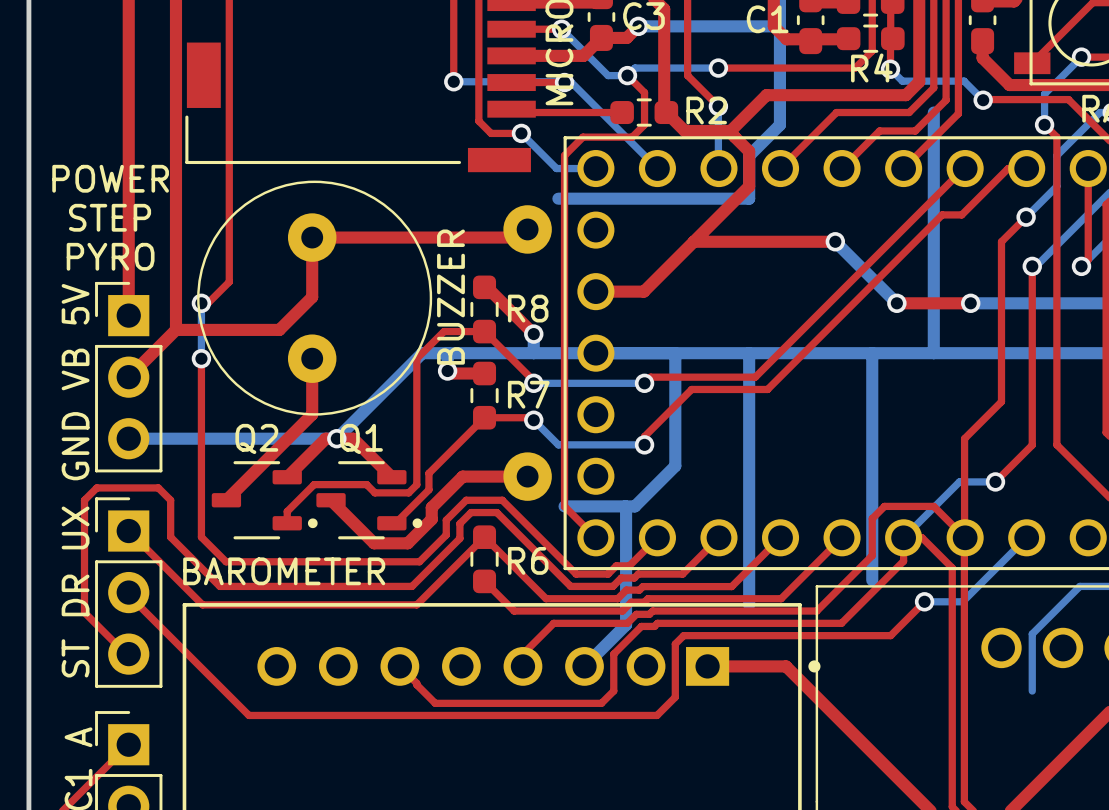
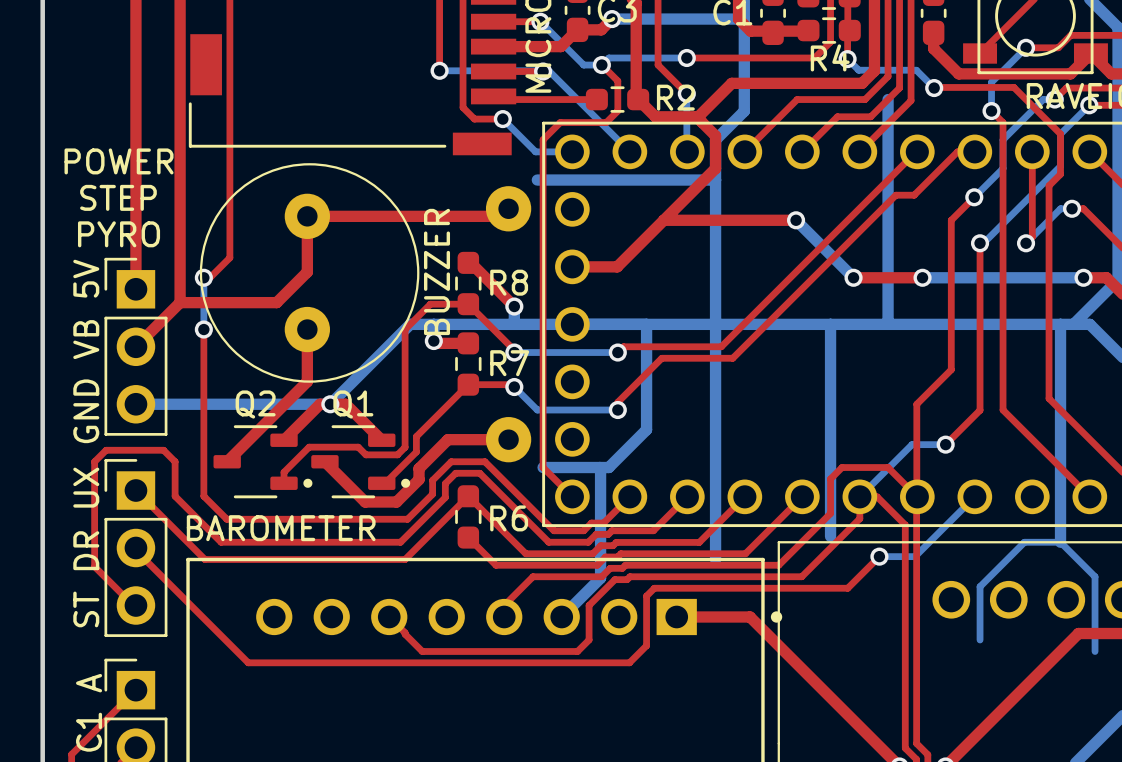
bottom track: none -> (715, 180) (715, 324)

